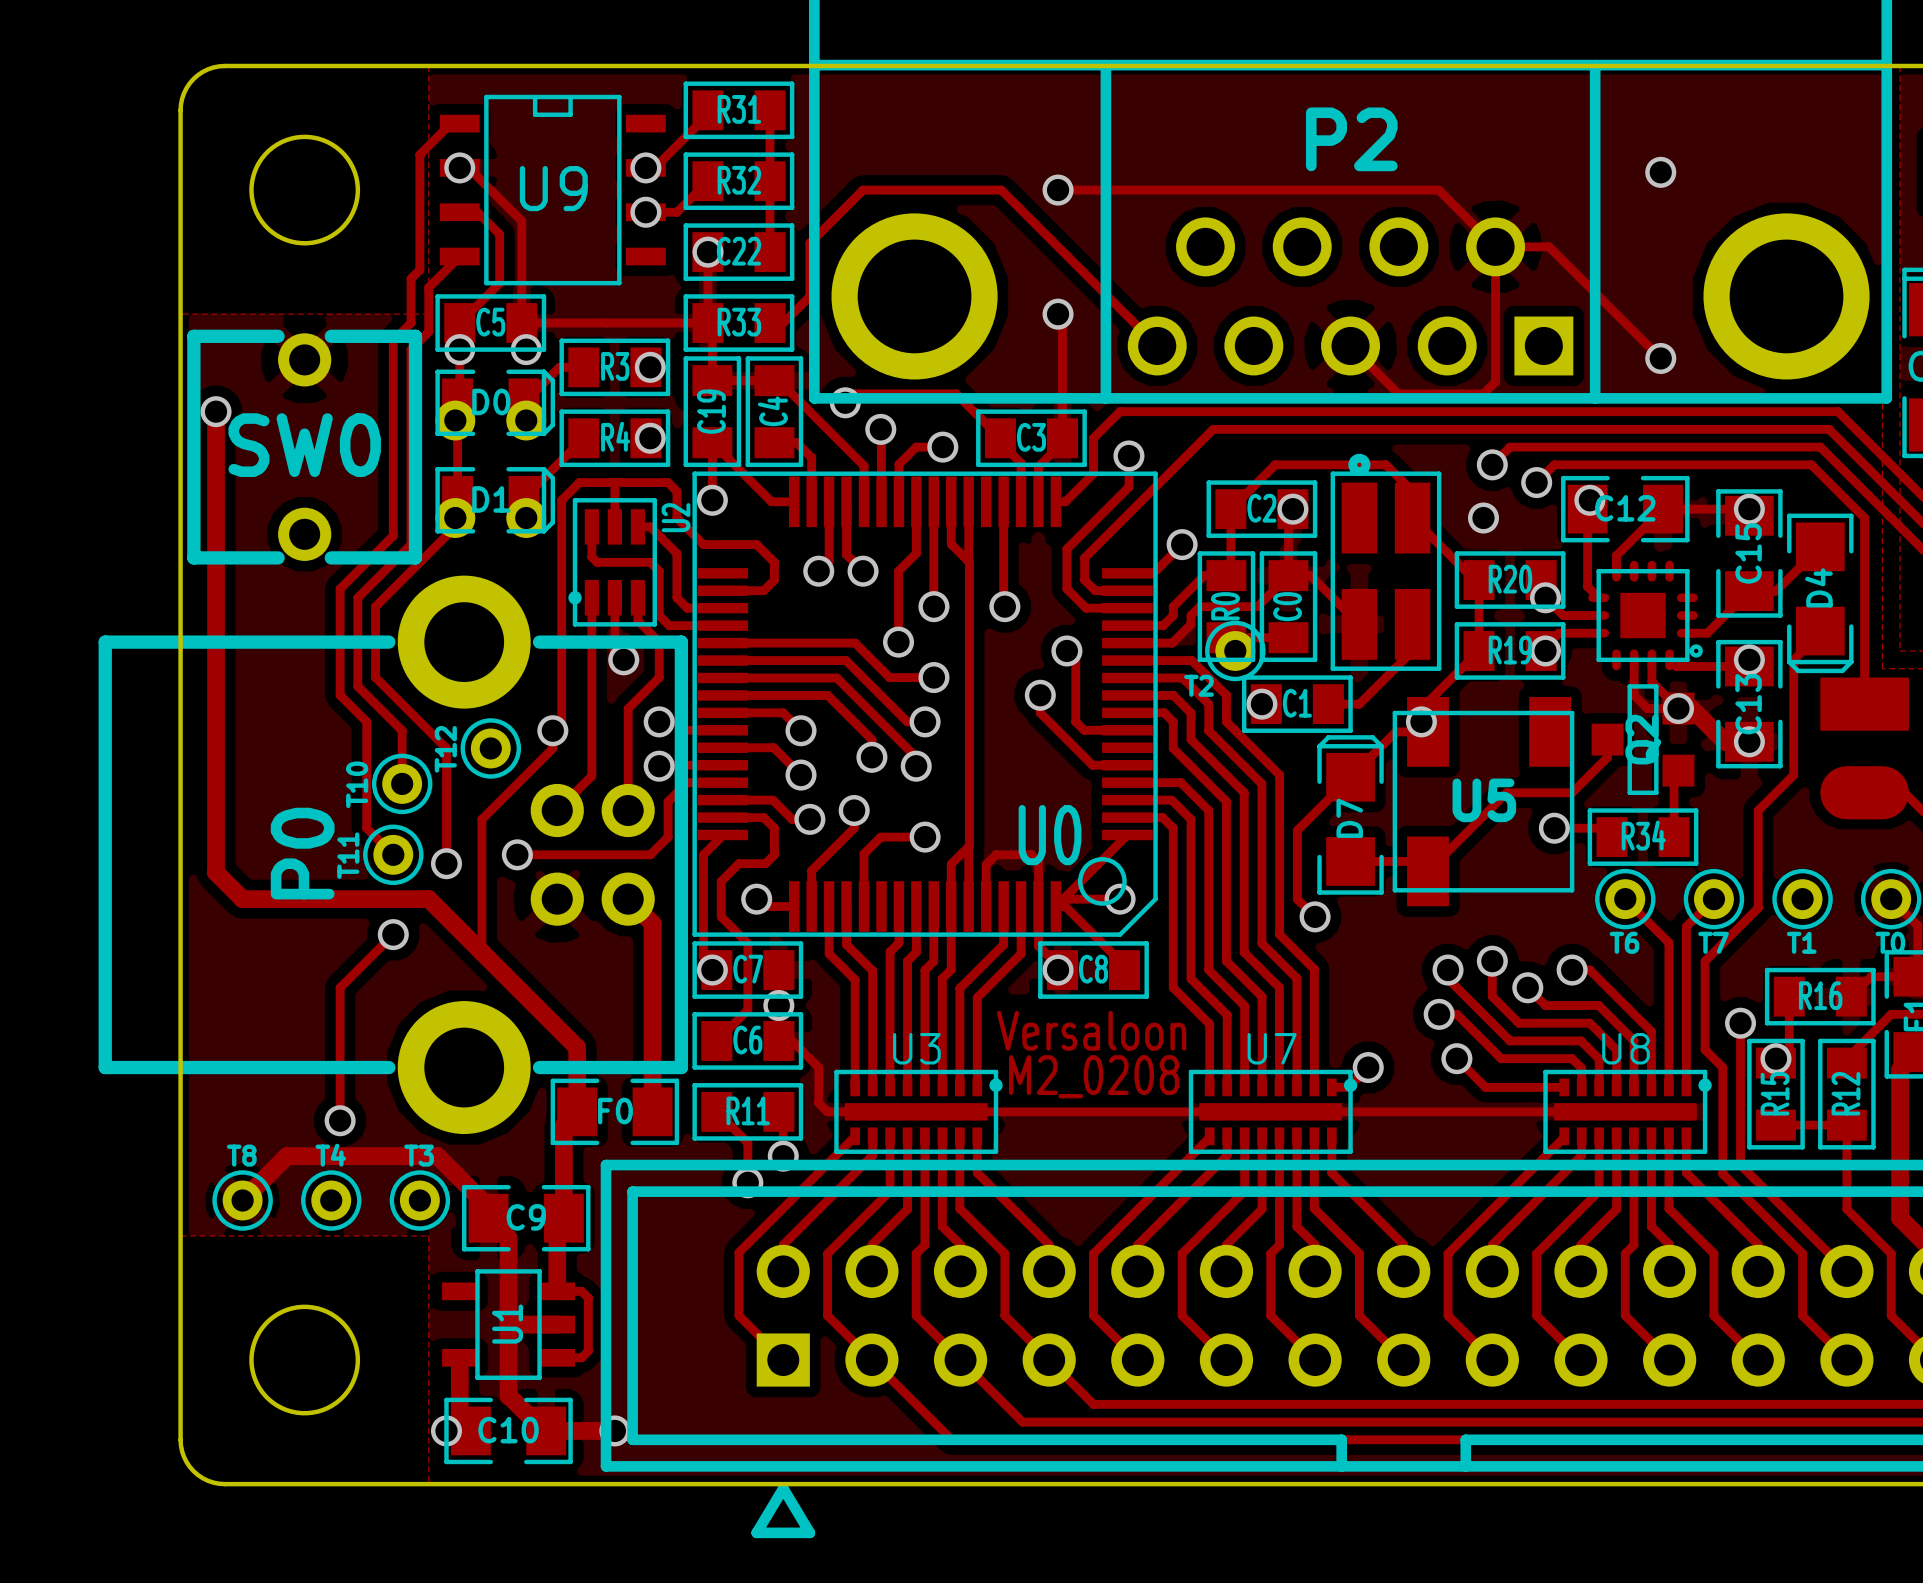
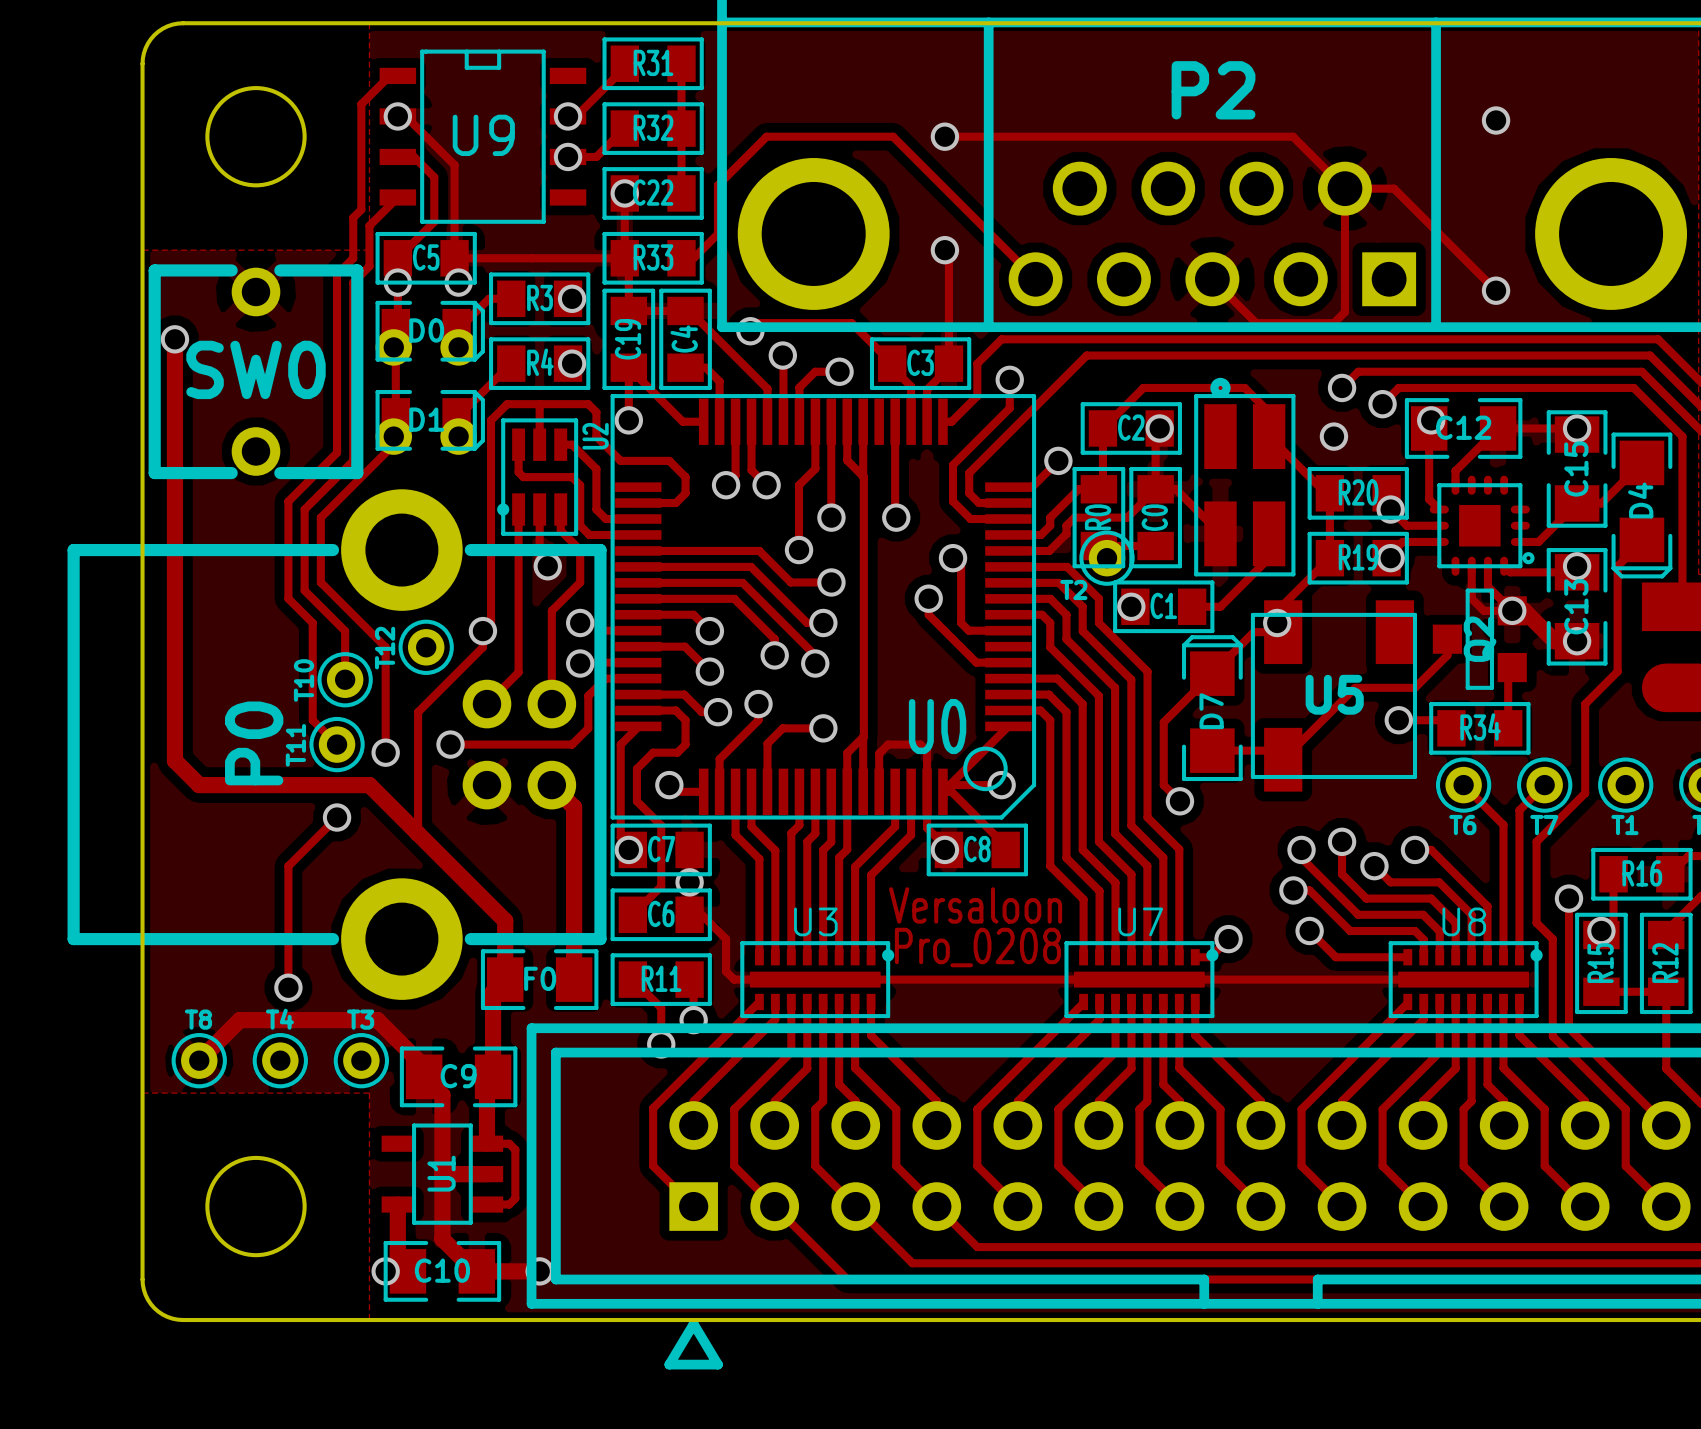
text: M2_0208 (1094, 1076) -> Pro_0208 (977, 947)

